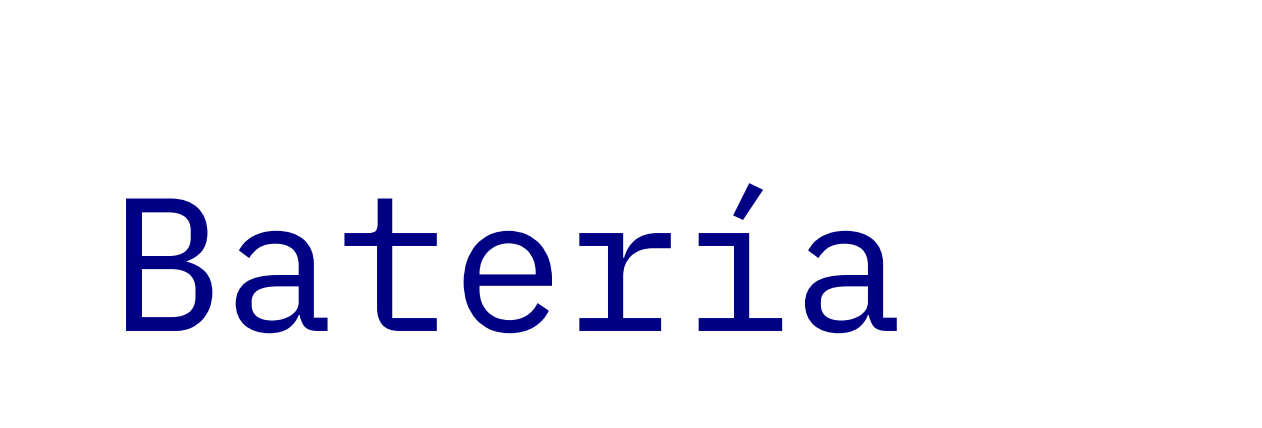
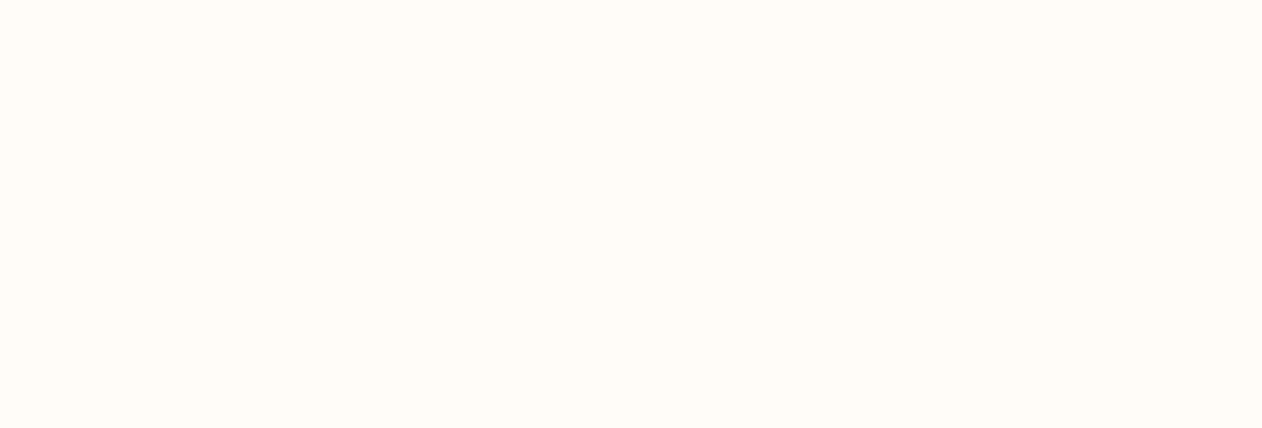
text: Batería (511, 258) -> none

